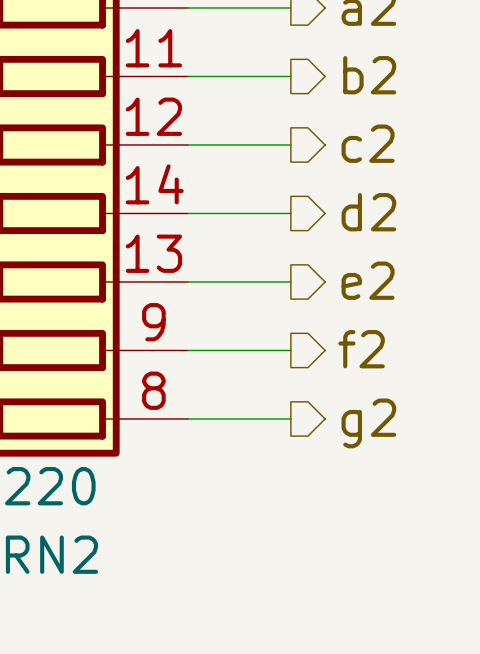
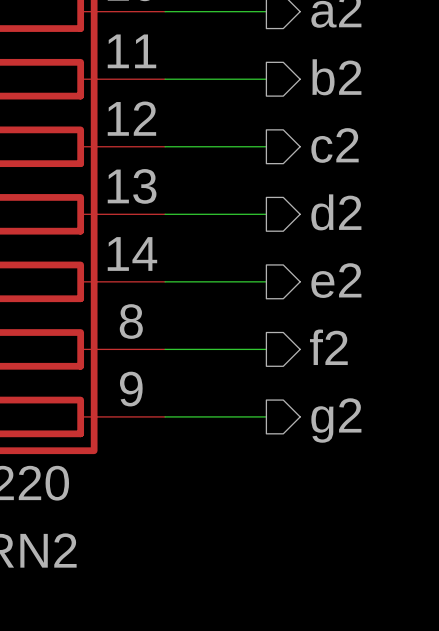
RN2 pin number: 14 (154, 184) -> 13 (132, 186)
RN2 pin number: 13 (153, 253) -> 14 (132, 253)
RN2 pin number: 9 (153, 322) -> 8 (131, 321)
RN2 pin number: 8 (153, 390) -> 9 (131, 389)

